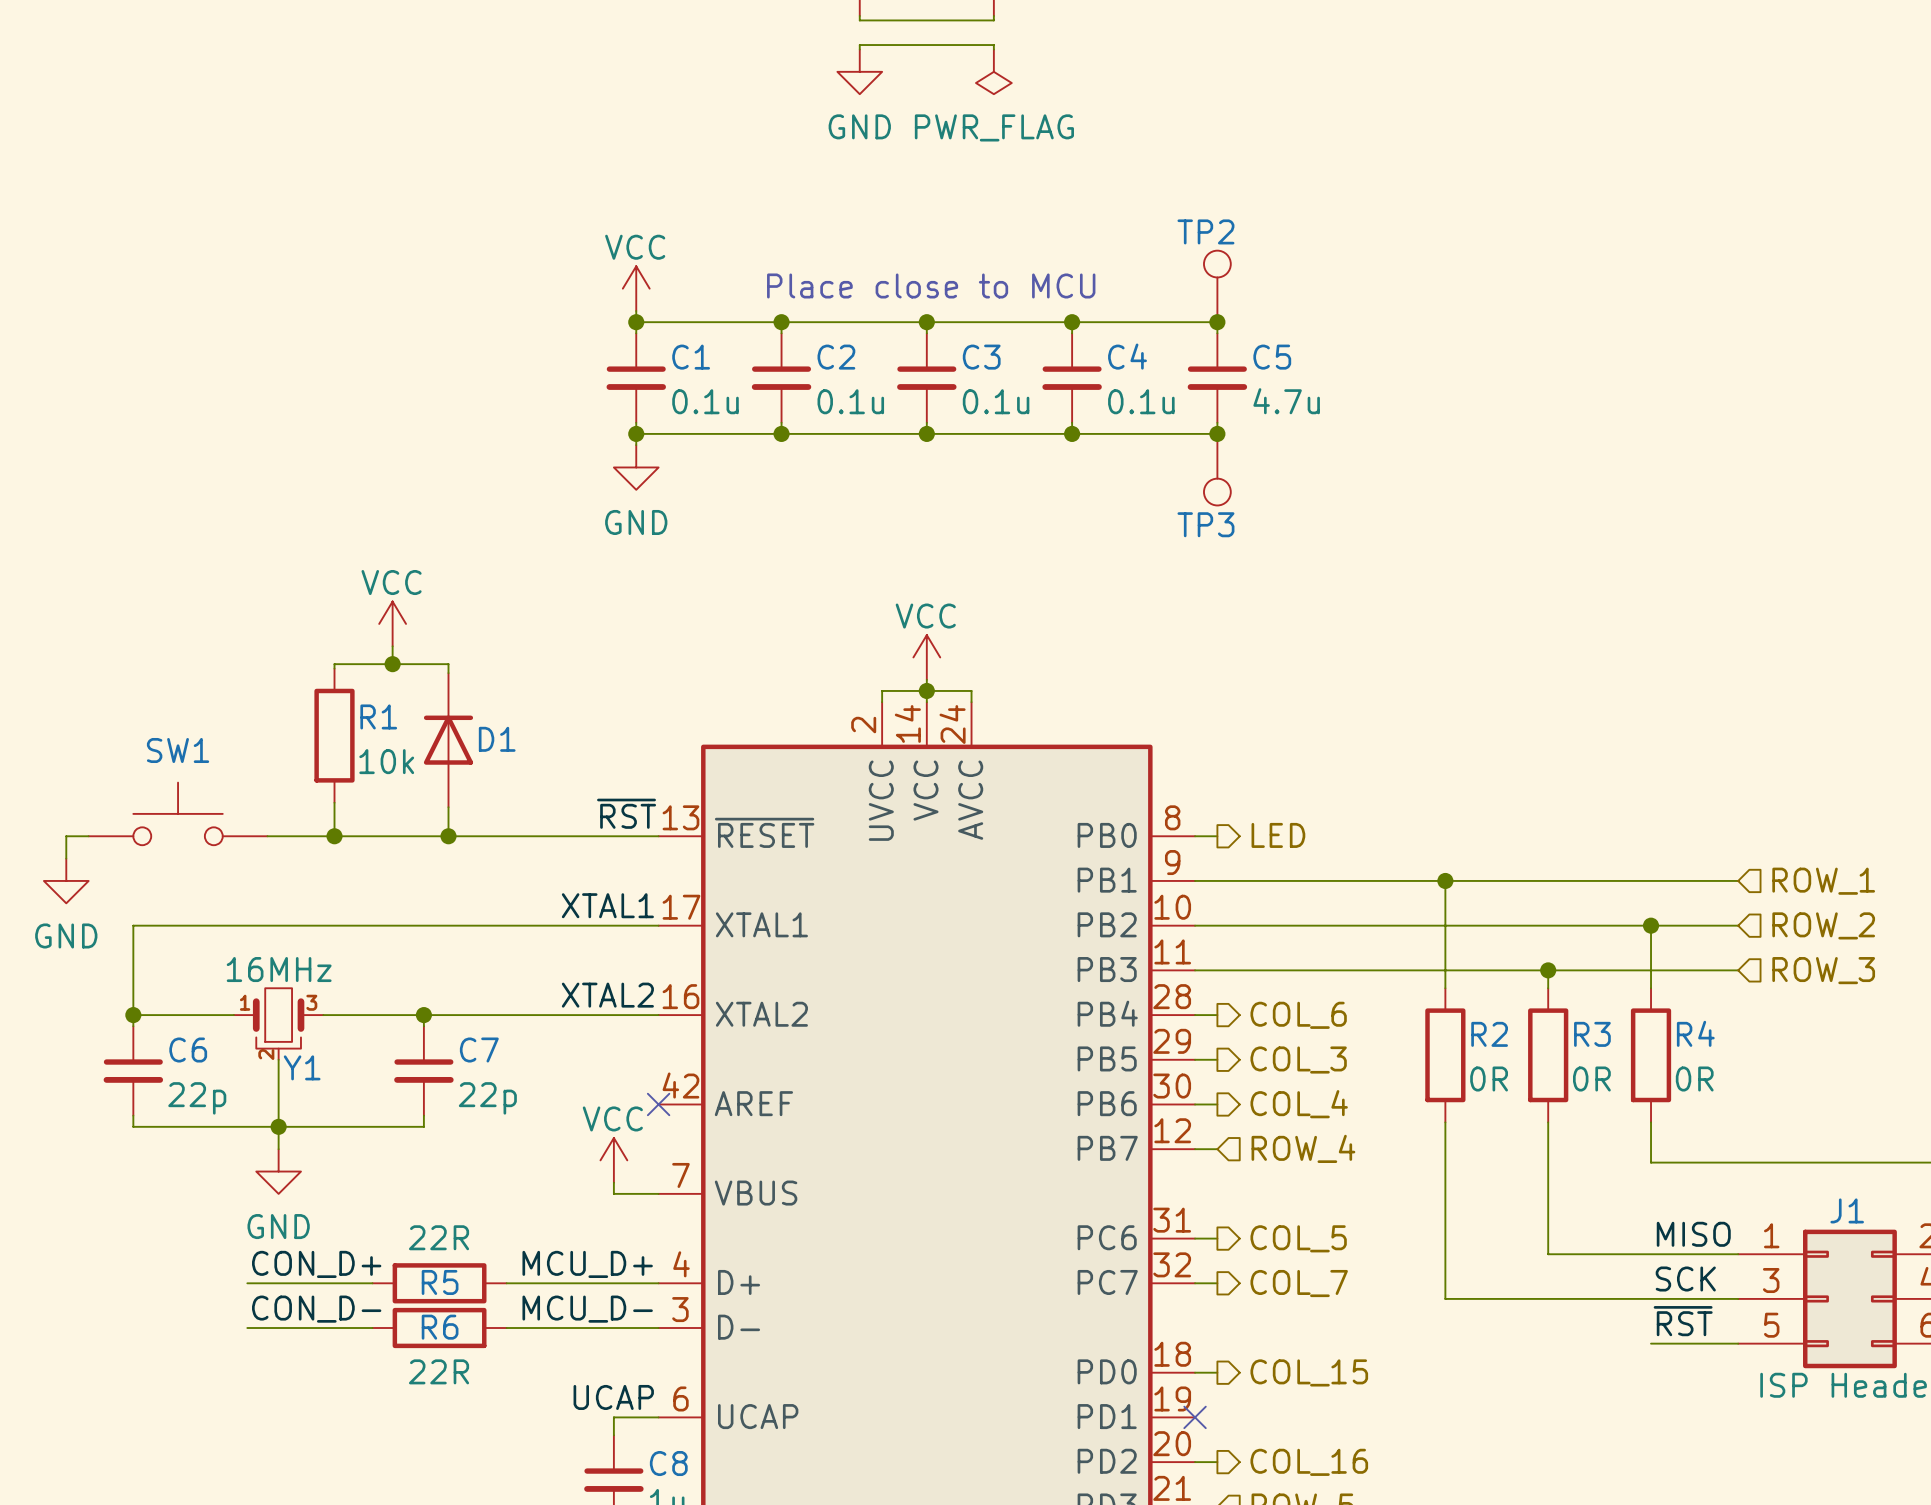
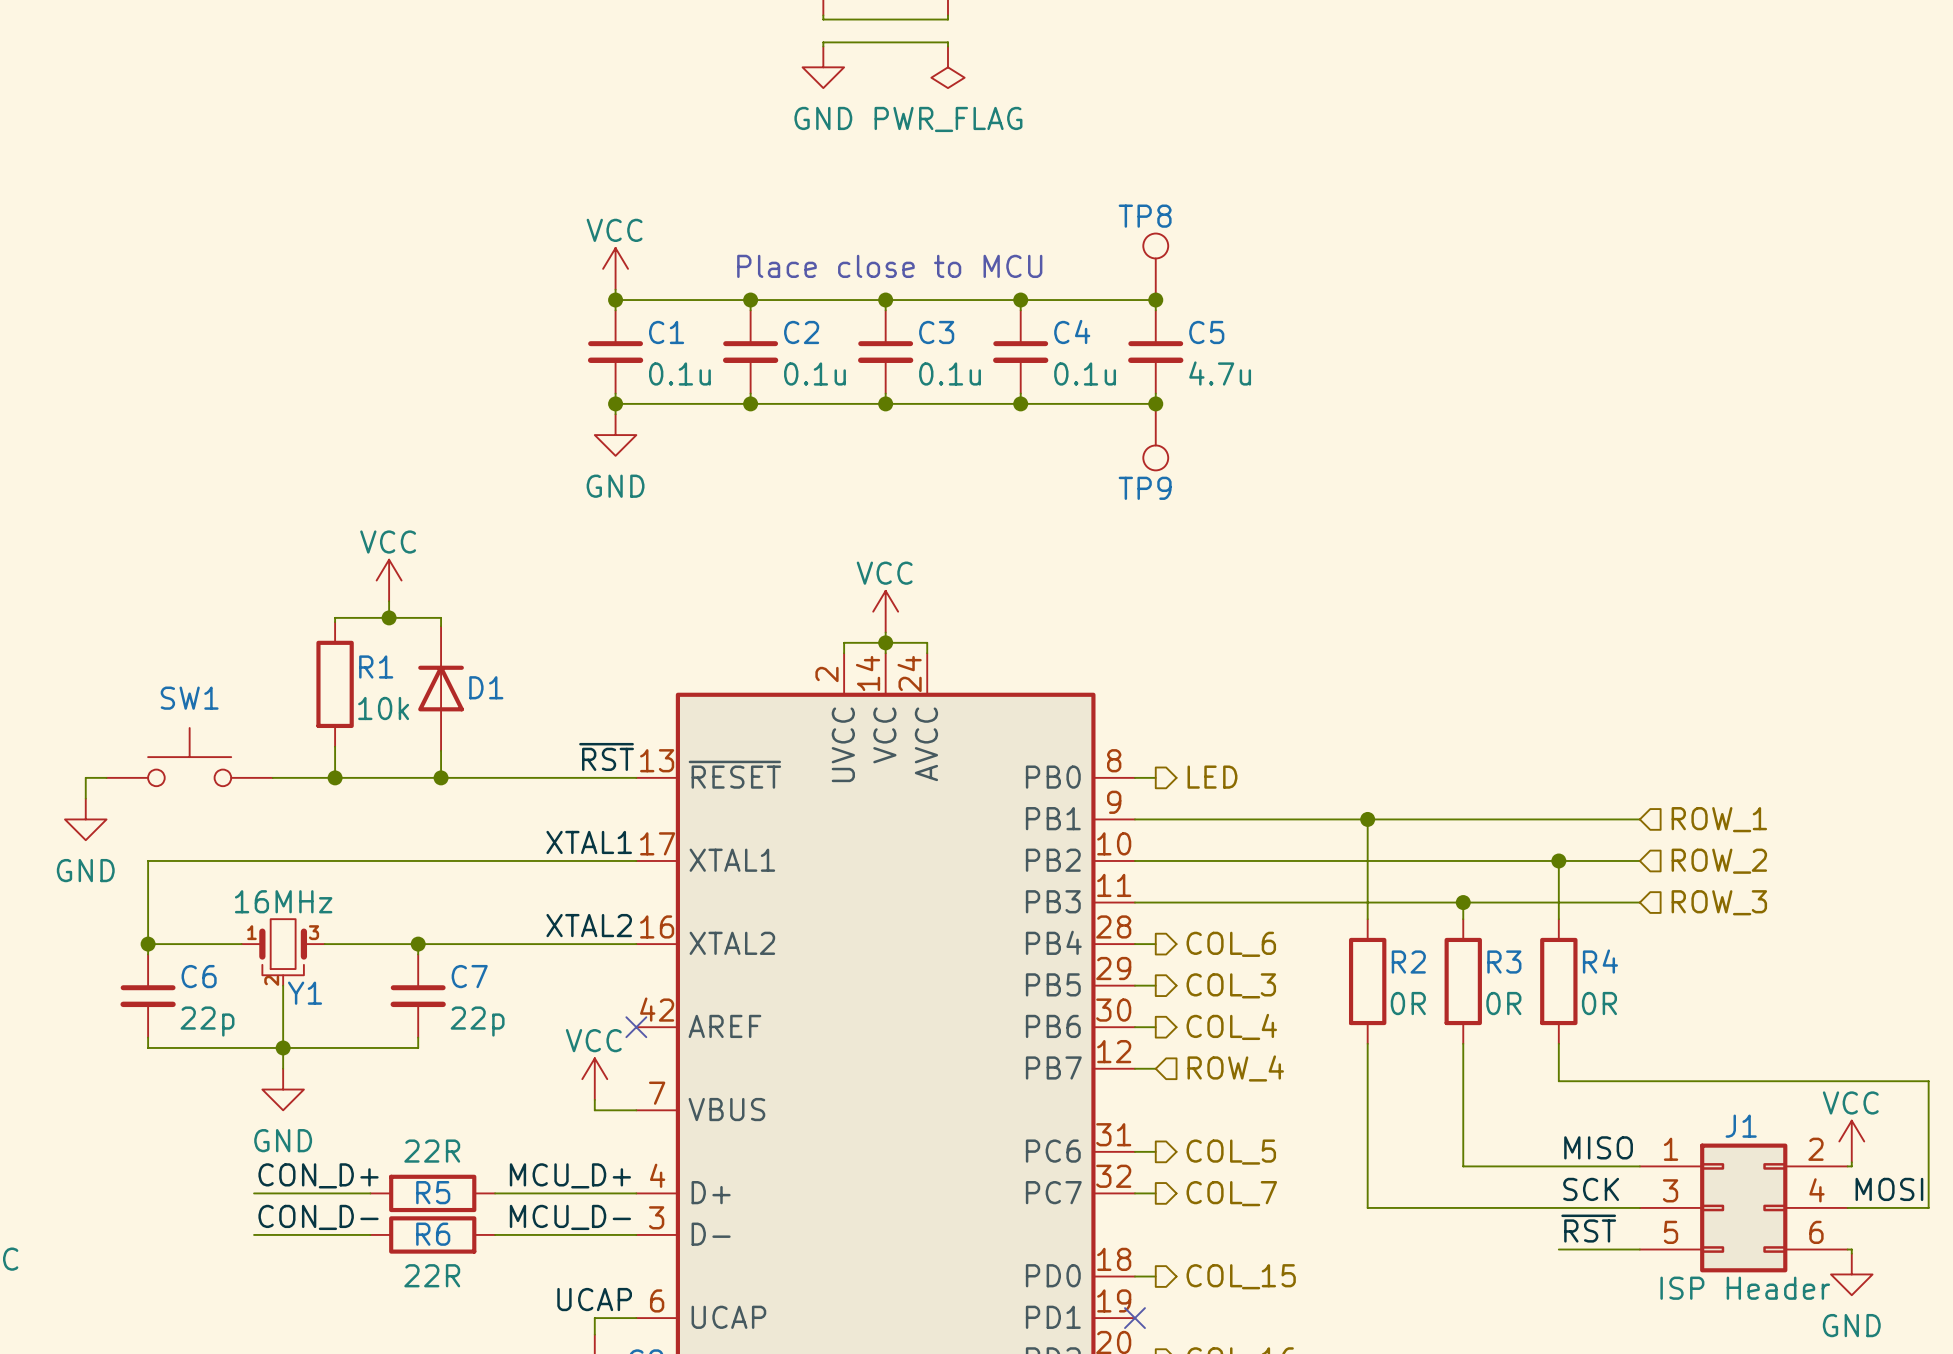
TP2 name: TP2 (1205, 231) -> TP8 (1145, 216)
TP3 name: TP3 (1205, 524) -> TP9 (1145, 488)

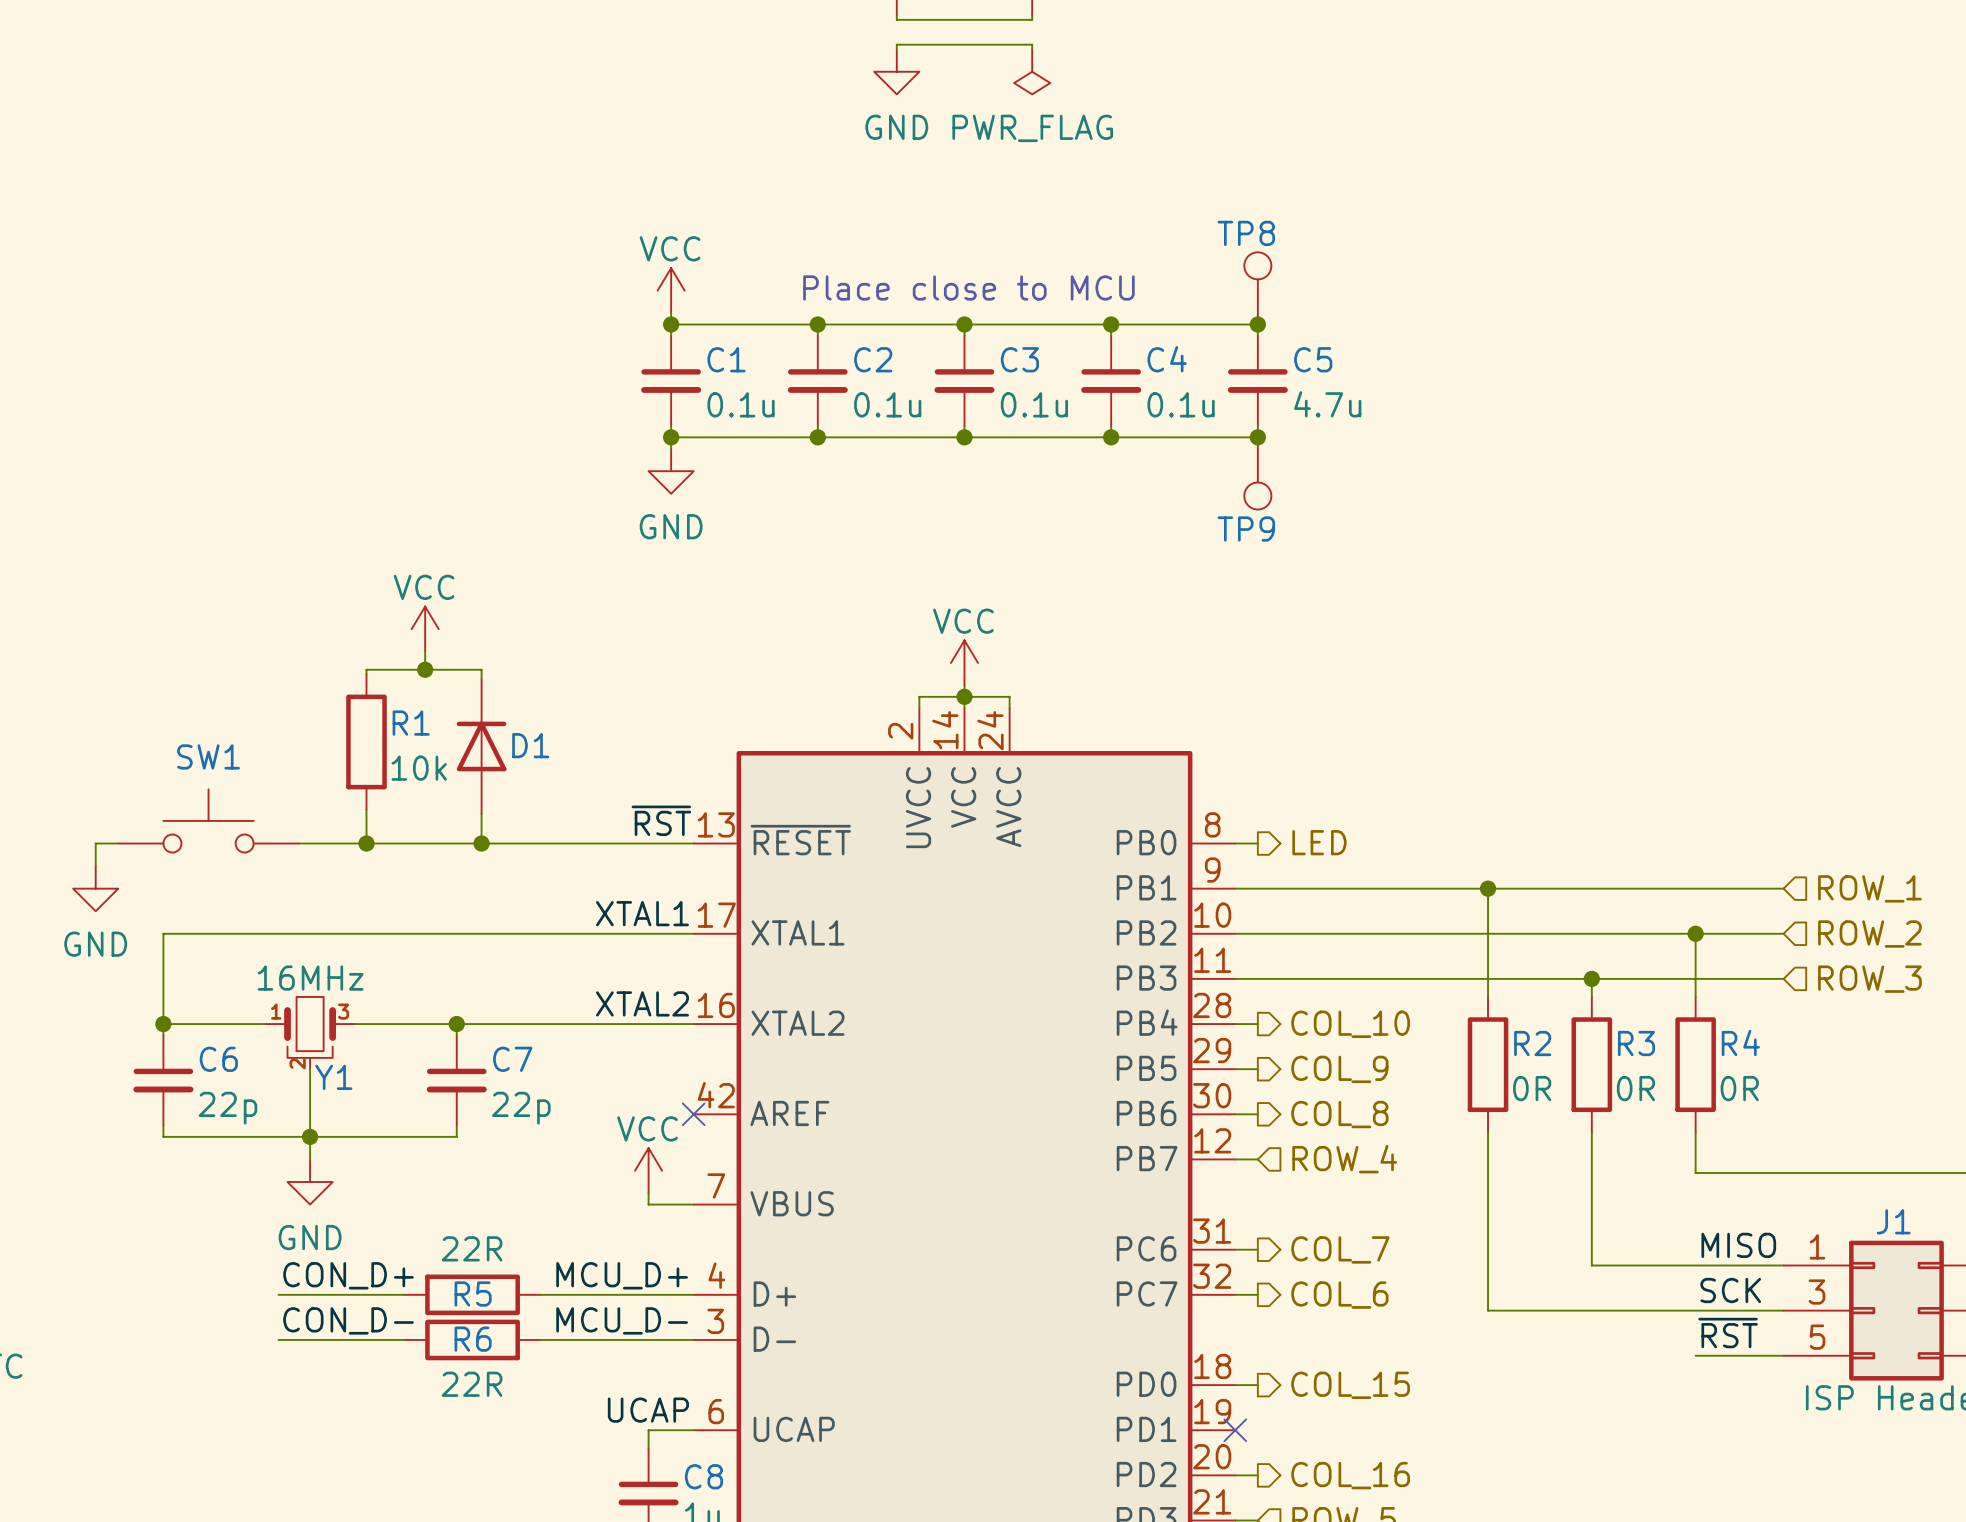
hierarchical label: COL_6 (1231, 944) -> COL_10 (1350, 1024)
hierarchical label: COL_3 (1231, 985) -> COL_9 (1339, 1069)
hierarchical label: COL_4 (1231, 1026) -> COL_8 (1339, 1114)
hierarchical label: COL_5 (1231, 1152) -> COL_7 (1340, 1249)
hierarchical label: COL_7 (1231, 1193) -> COL_6 (1339, 1295)

